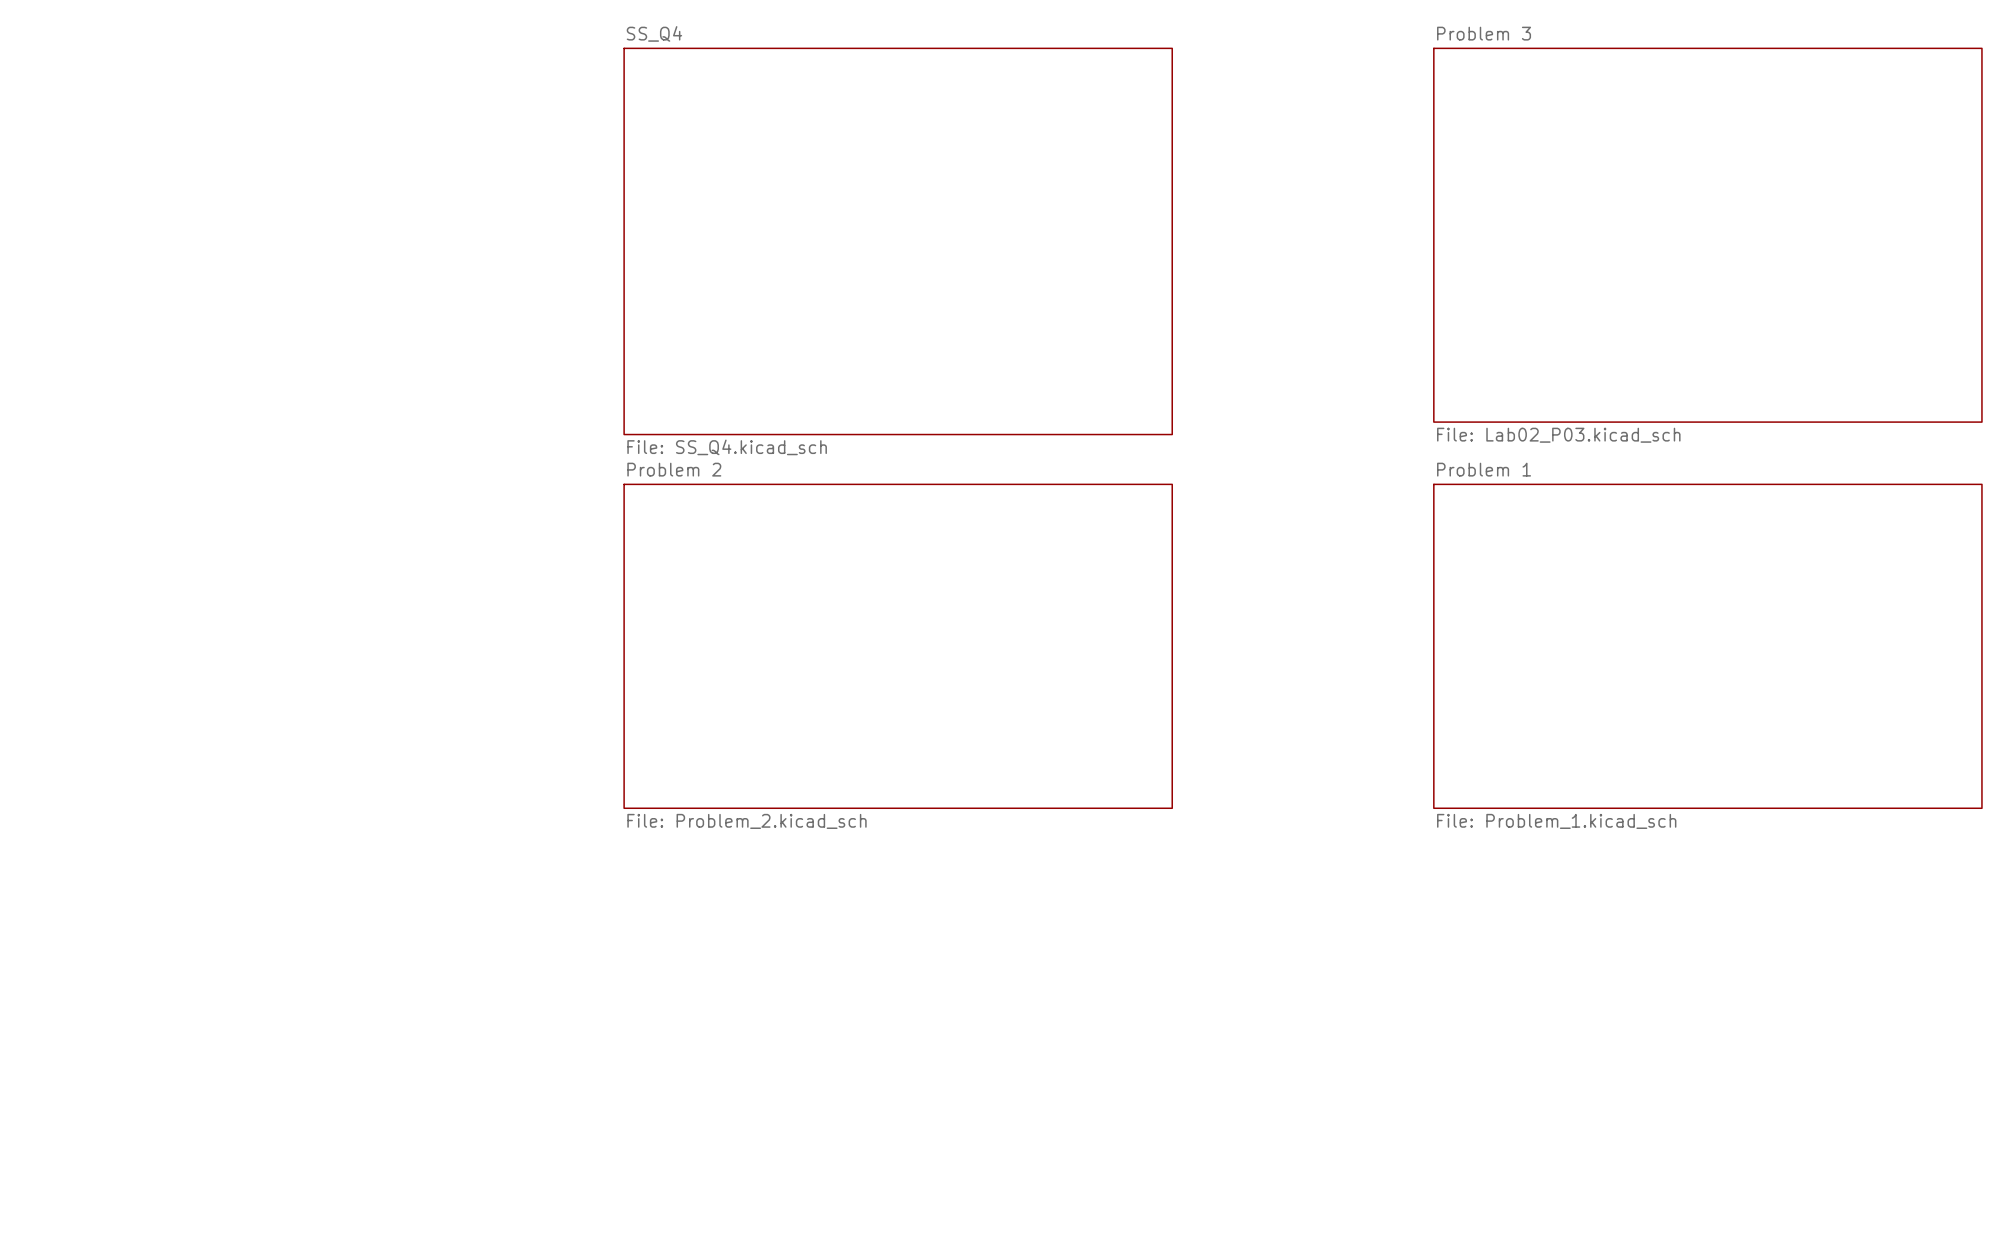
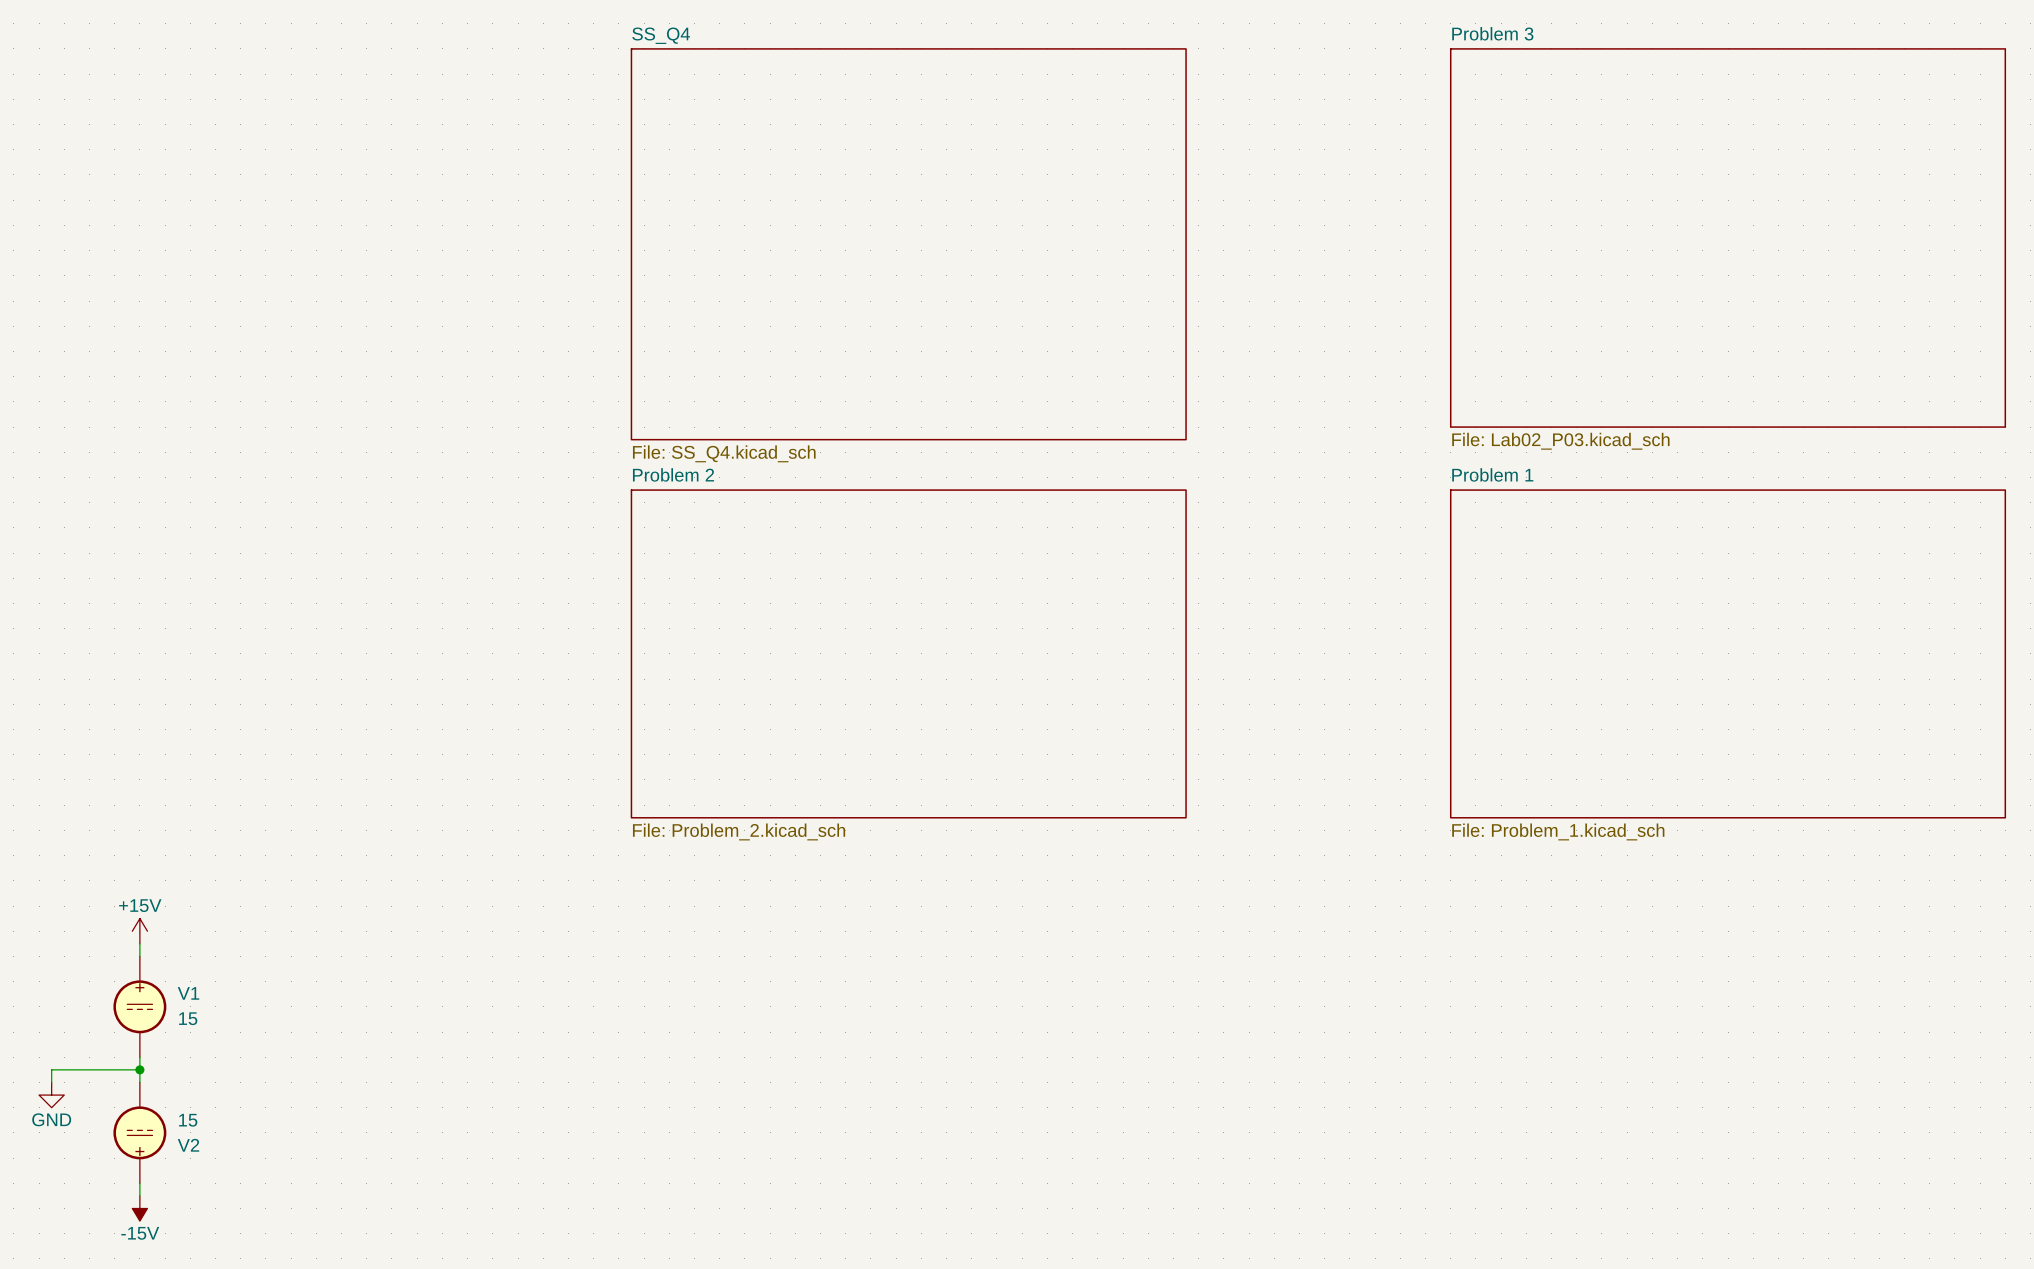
power symbol: none -> +15V (139, 931)
wire: none -> (139, 943) (139, 956)
V1: none -> 15 (139, 1006)
wire: none -> (139, 1057) (139, 1082)
wire: none -> (139, 1069) (51, 1069) (51, 1082)
junction: none -> (139, 1069)
power symbol: none -> GND (51, 1095)
V2: none -> 15 (139, 1132)
wire: none -> (139, 1183) (139, 1195)
power symbol: none -> -15V (139, 1208)

